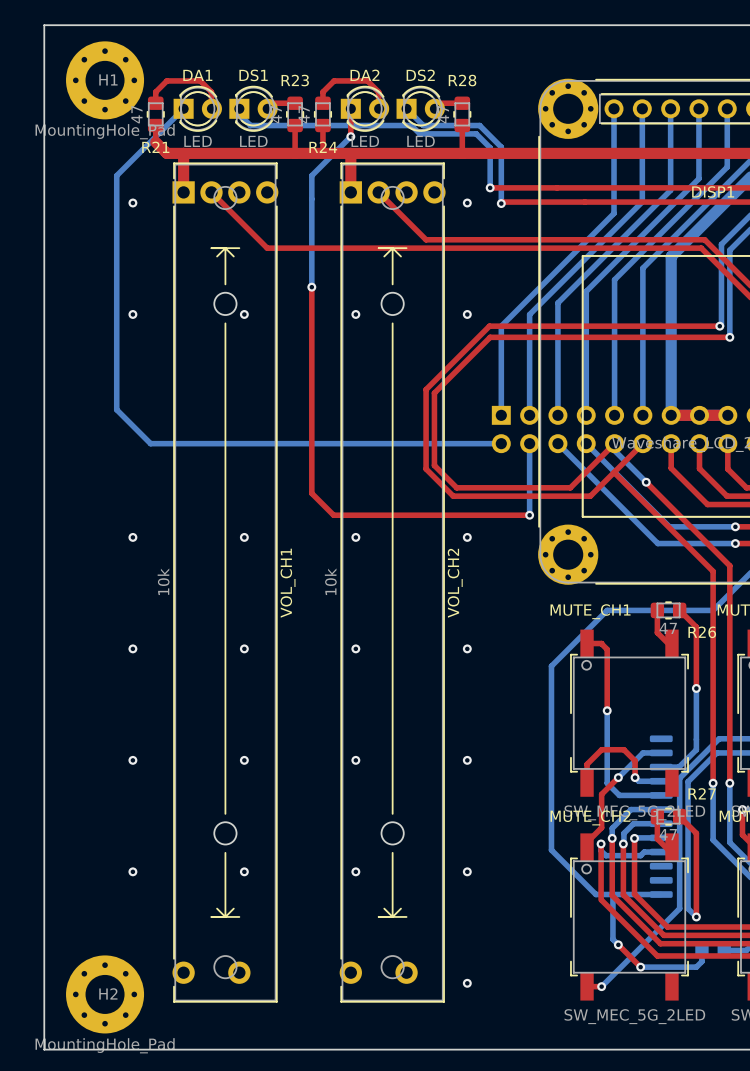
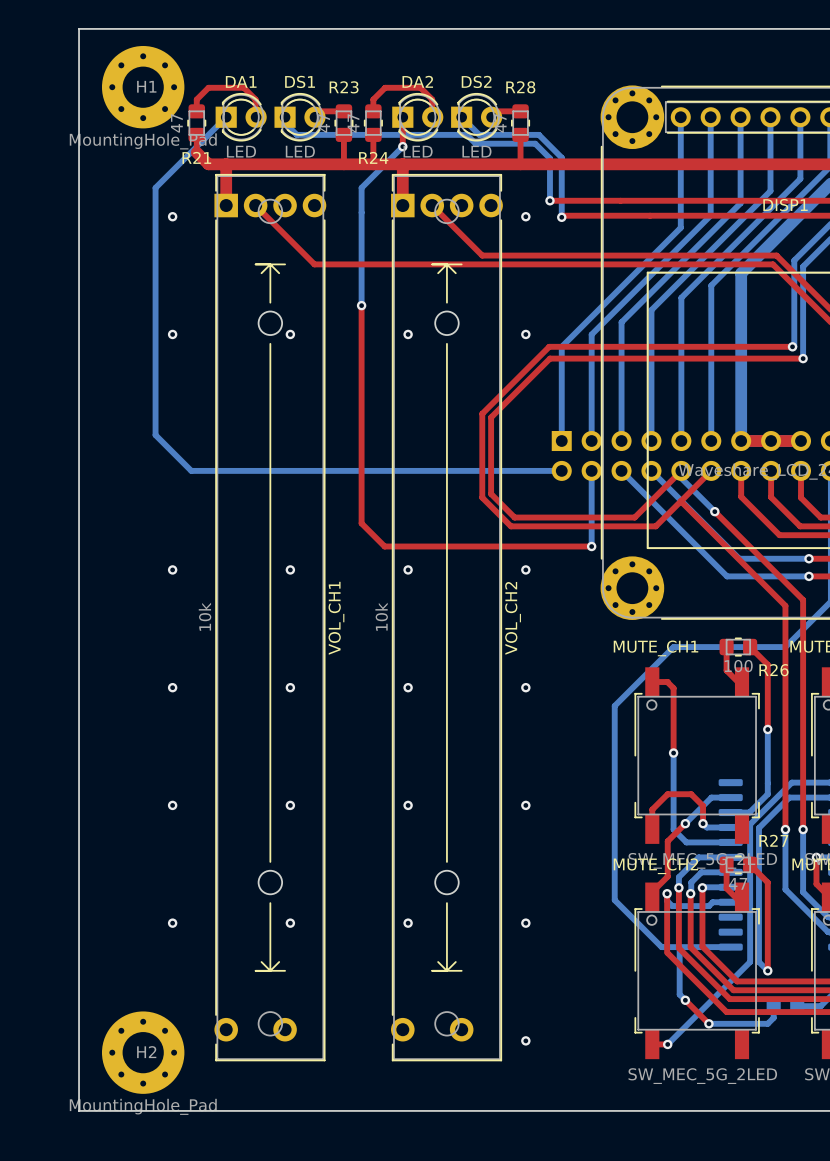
R26 value: 47 (668, 628) -> 100 (738, 666)

